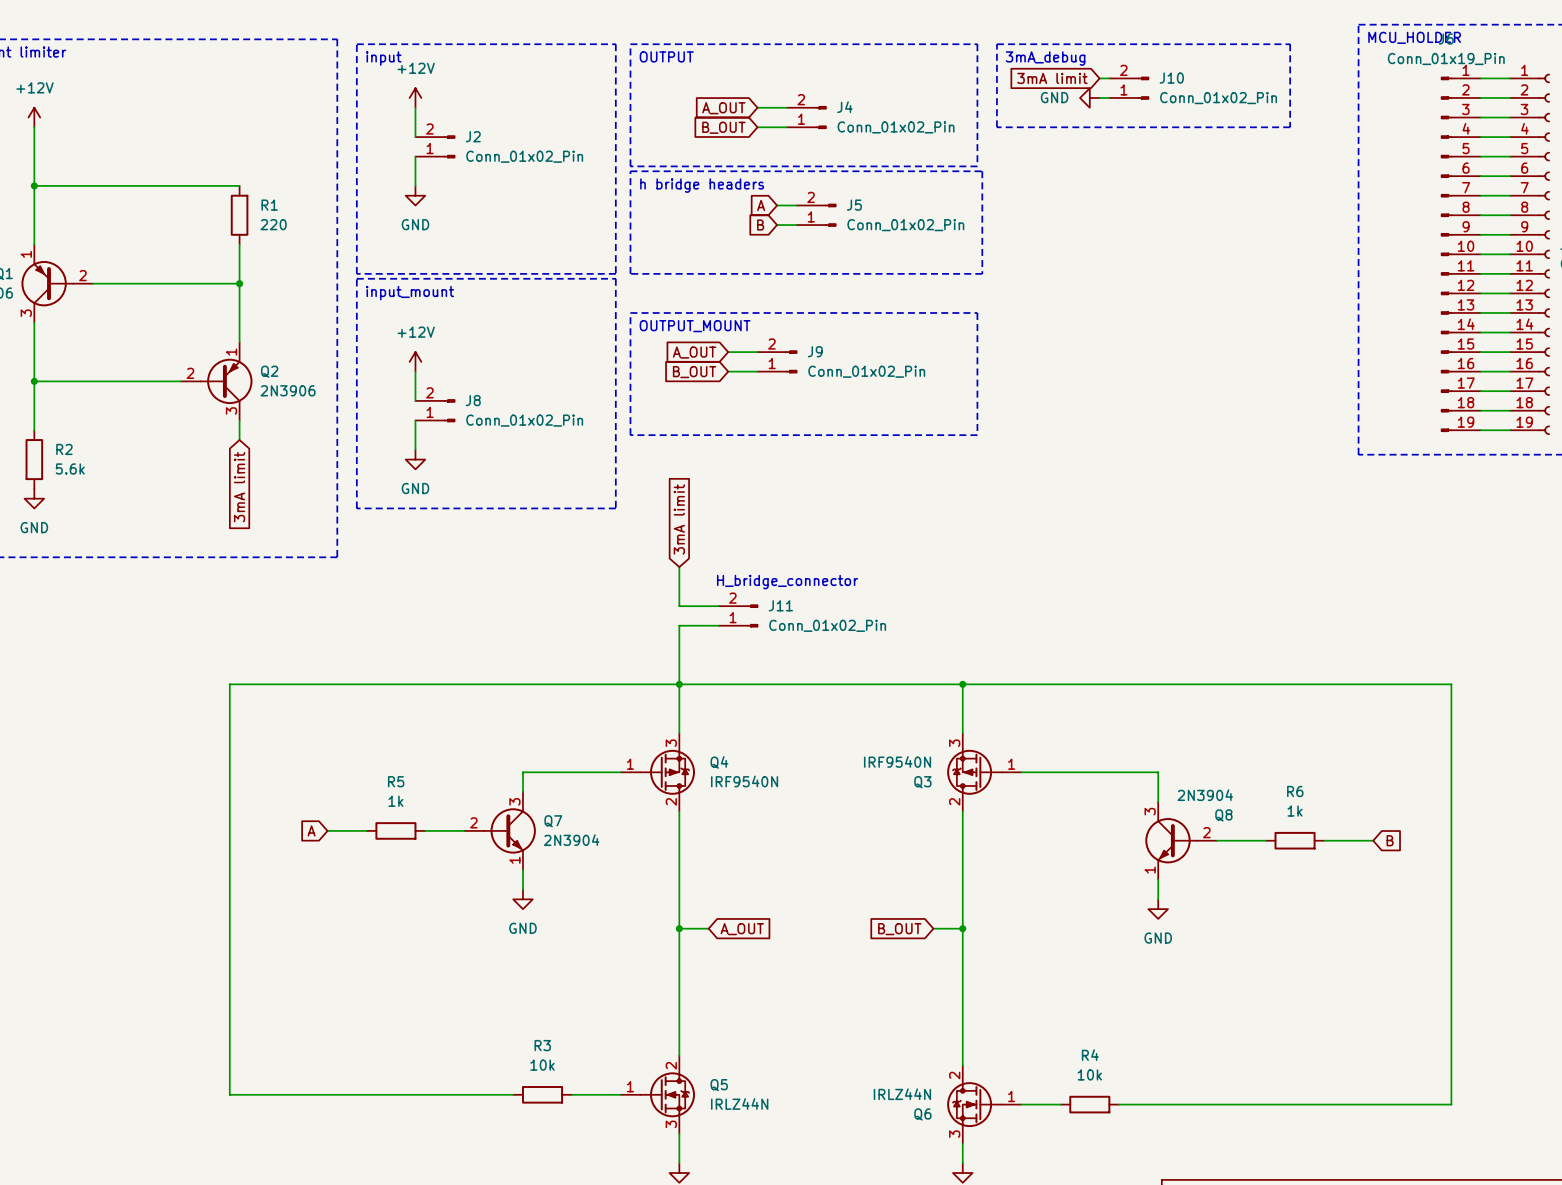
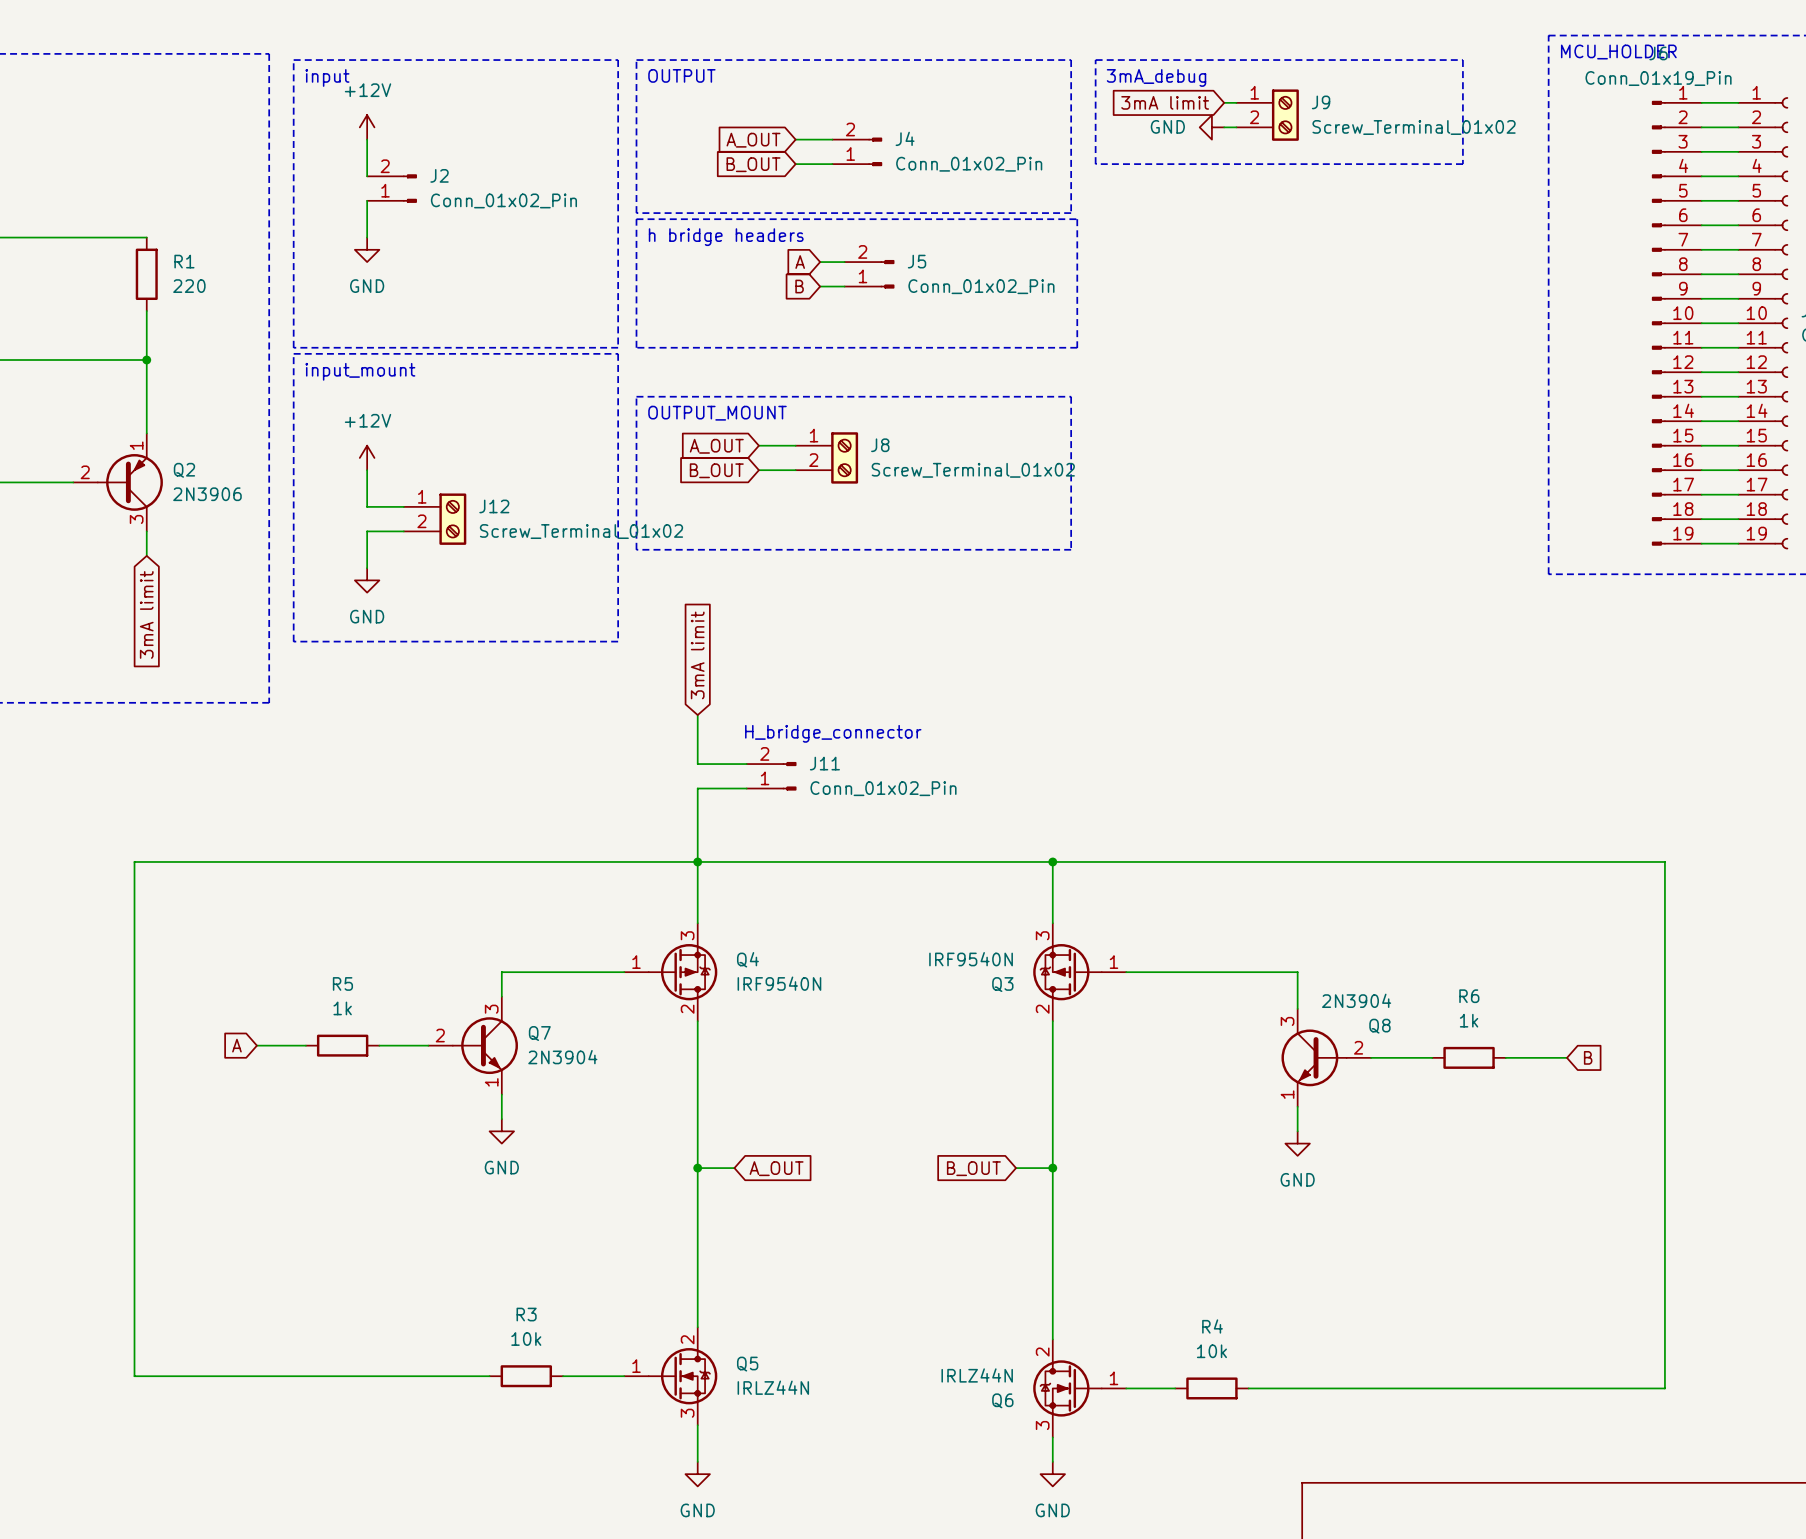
J10: Conn_01x02_Pin (1129, 88) -> none
J9 symbol: [757, 350, 798, 374] -> [1236, 89, 1299, 141]
J9 value: Conn_01x02_Pin (866, 371) -> Screw_Terminal_01x02 (1414, 127)
J8 symbol: [415, 399, 456, 423] -> [795, 432, 859, 484]
J12: none -> Screw_Terminal_01x02 (435, 519)
J8 value: Conn_01x02_Pin (524, 420) -> Screw_Terminal_01x02 (973, 470)

